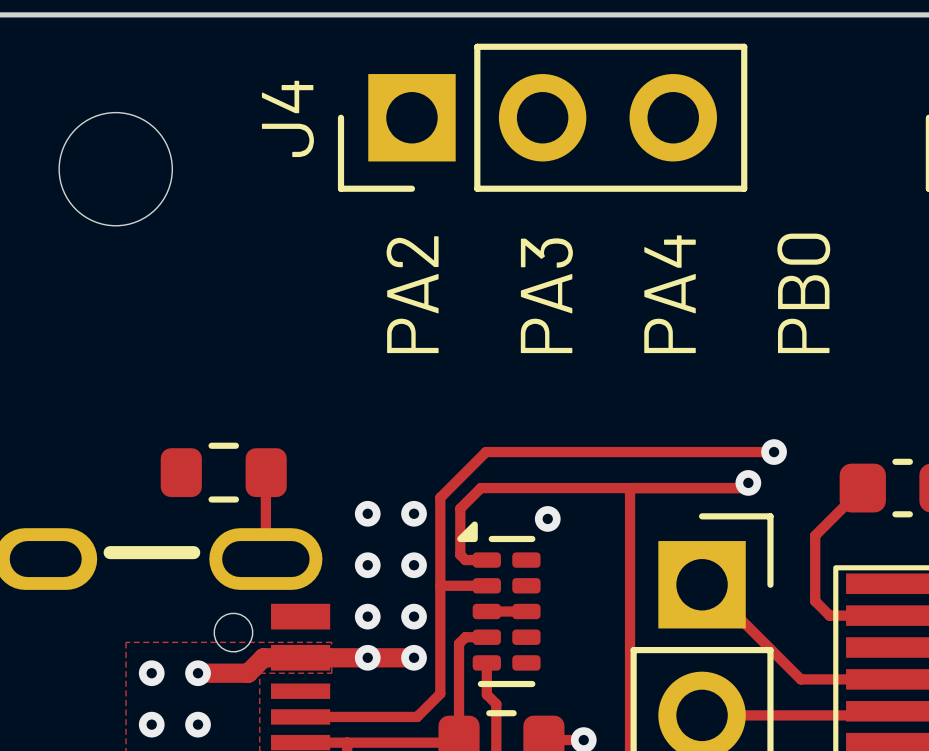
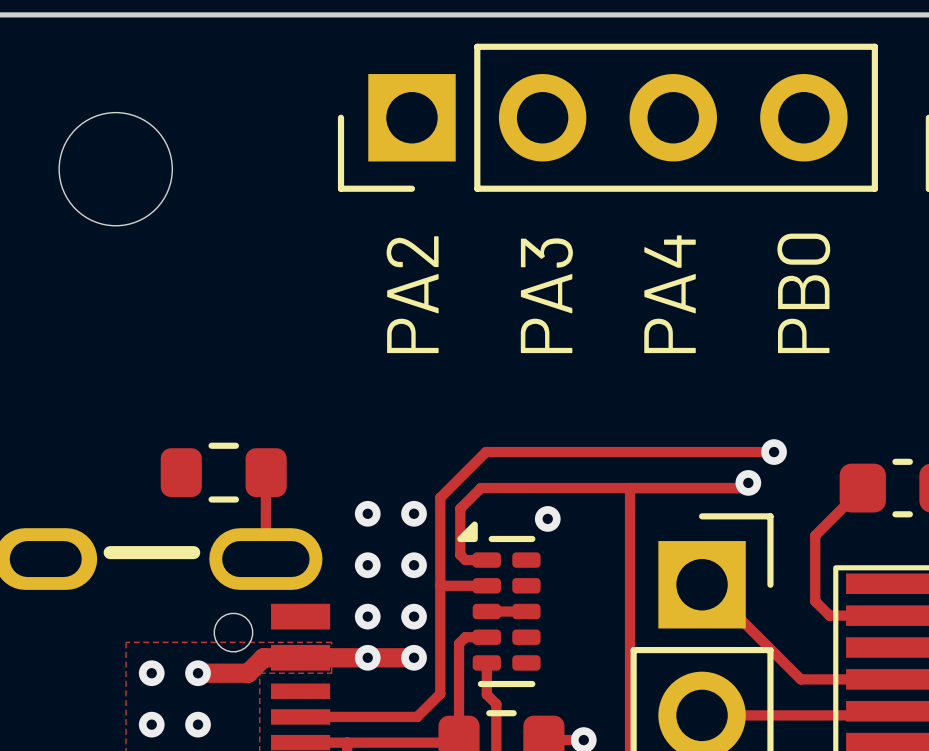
J4: (542, 117) -> none
part: none -> (607, 117)

